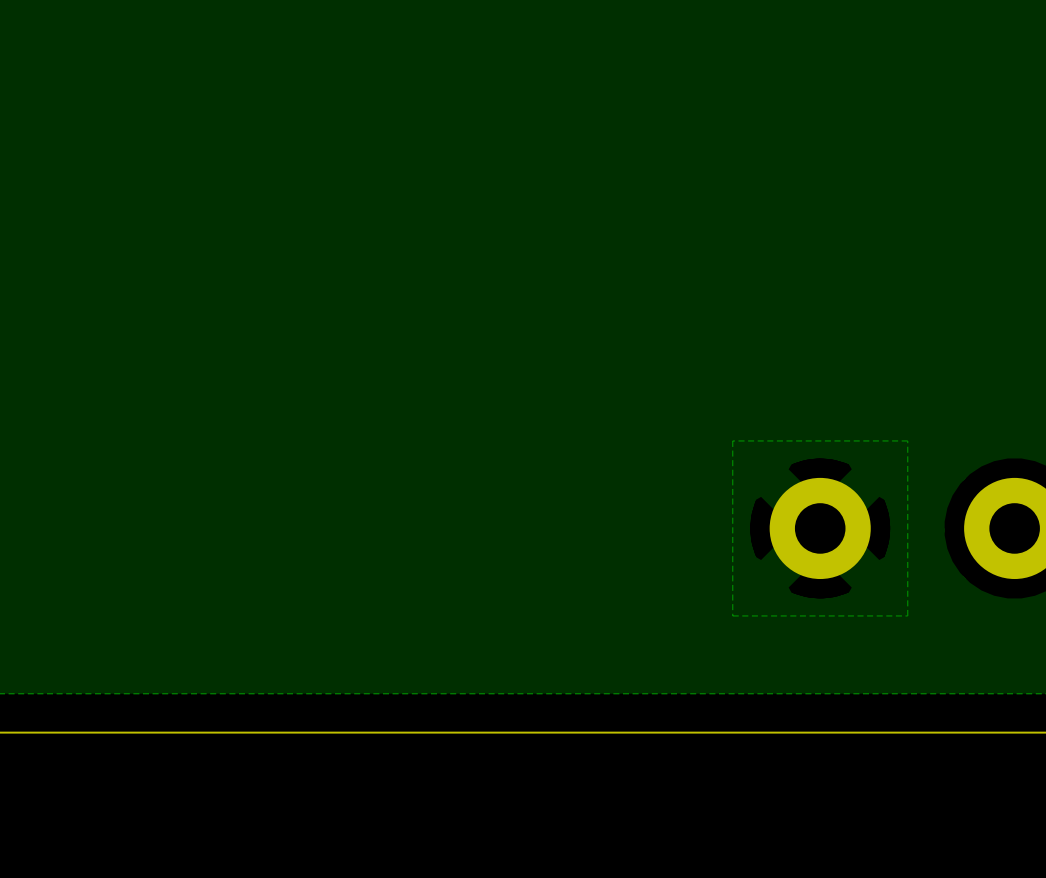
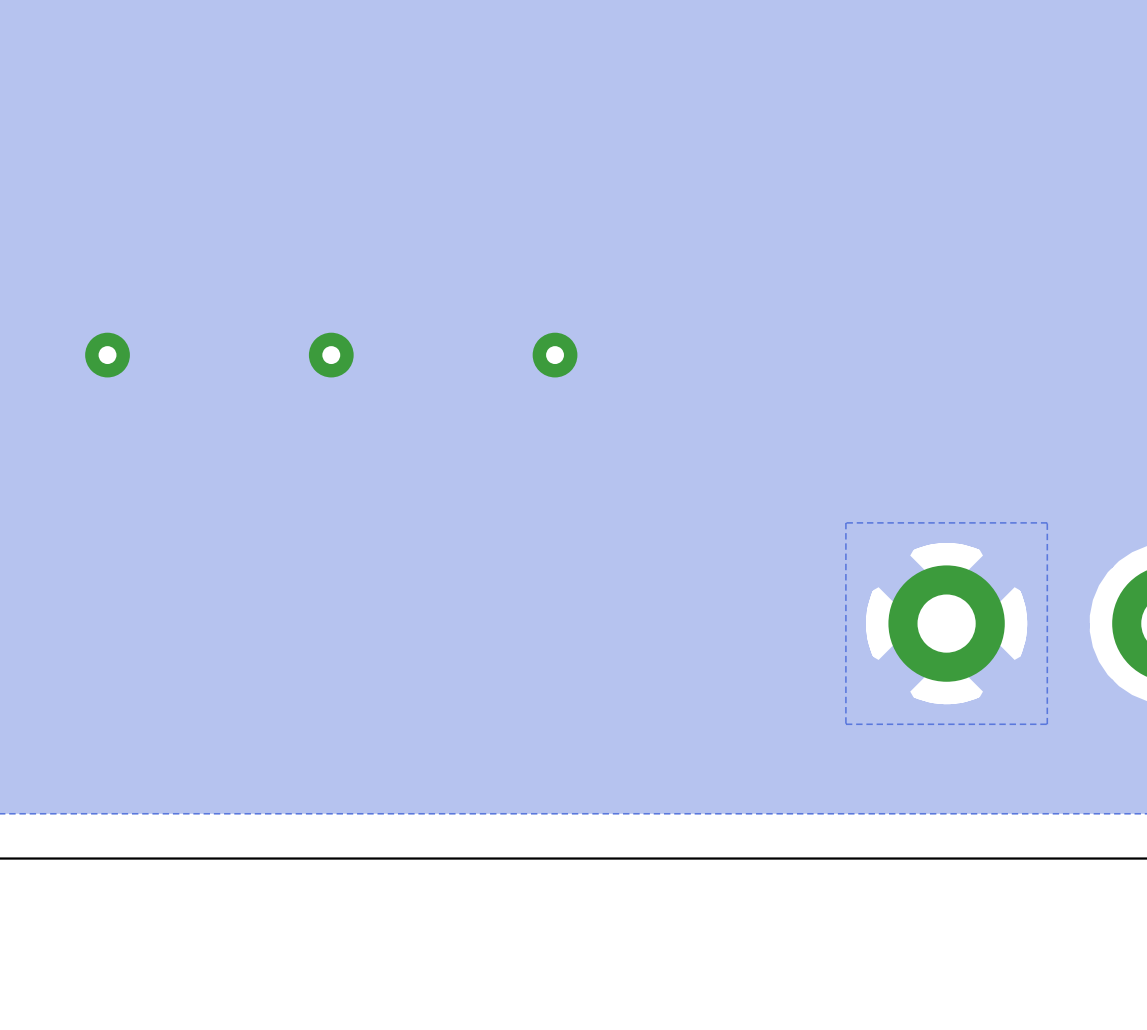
via: none -> (107, 355)
via: none -> (331, 355)
via: none -> (555, 355)

